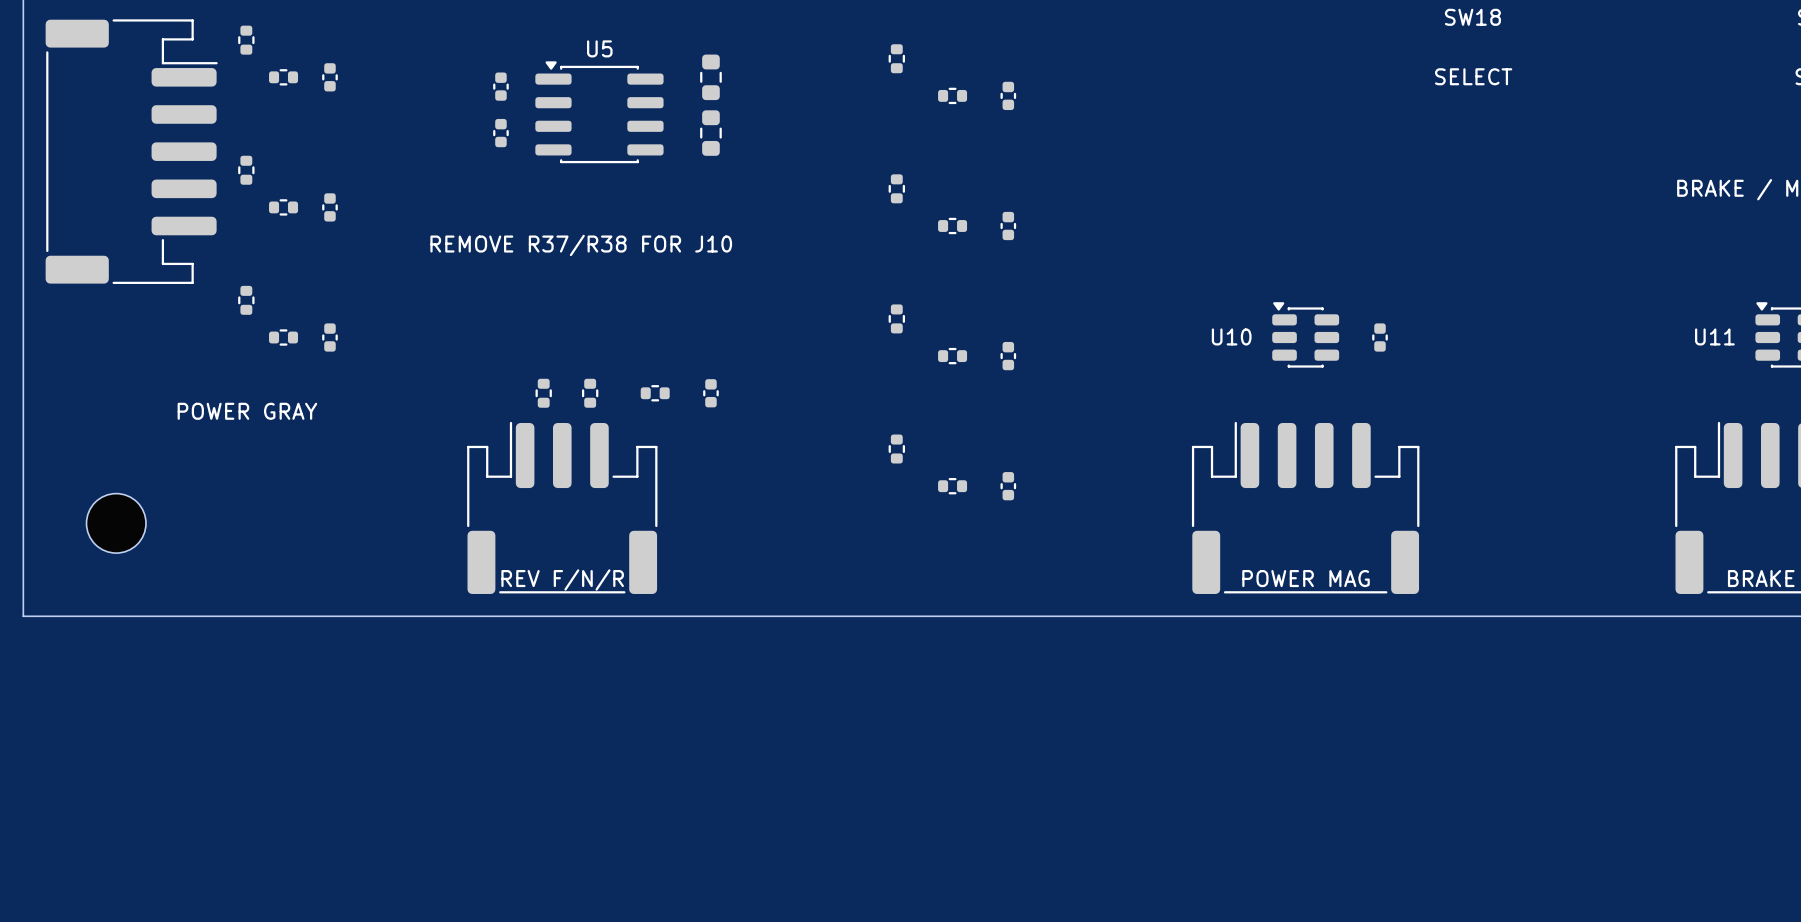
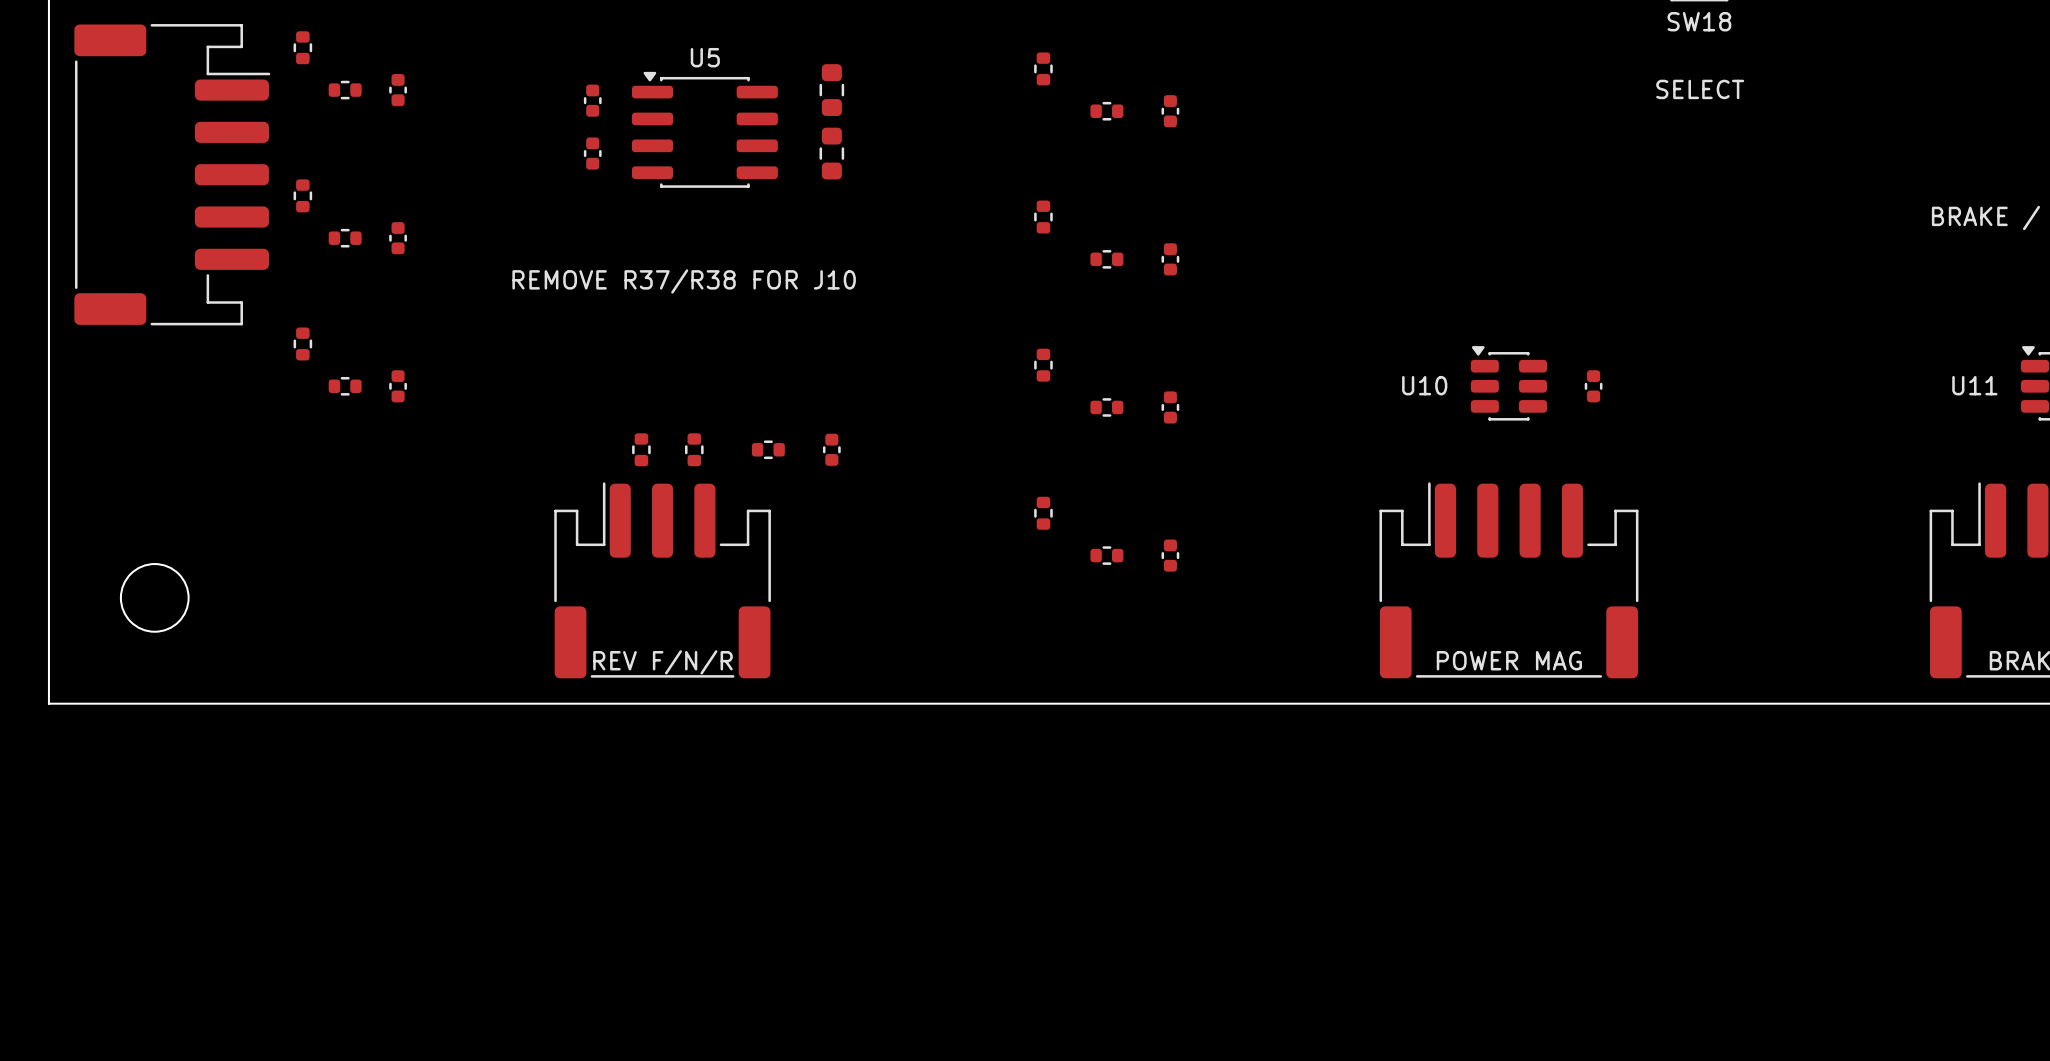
text: POWER GRAY (247, 411) -> none

